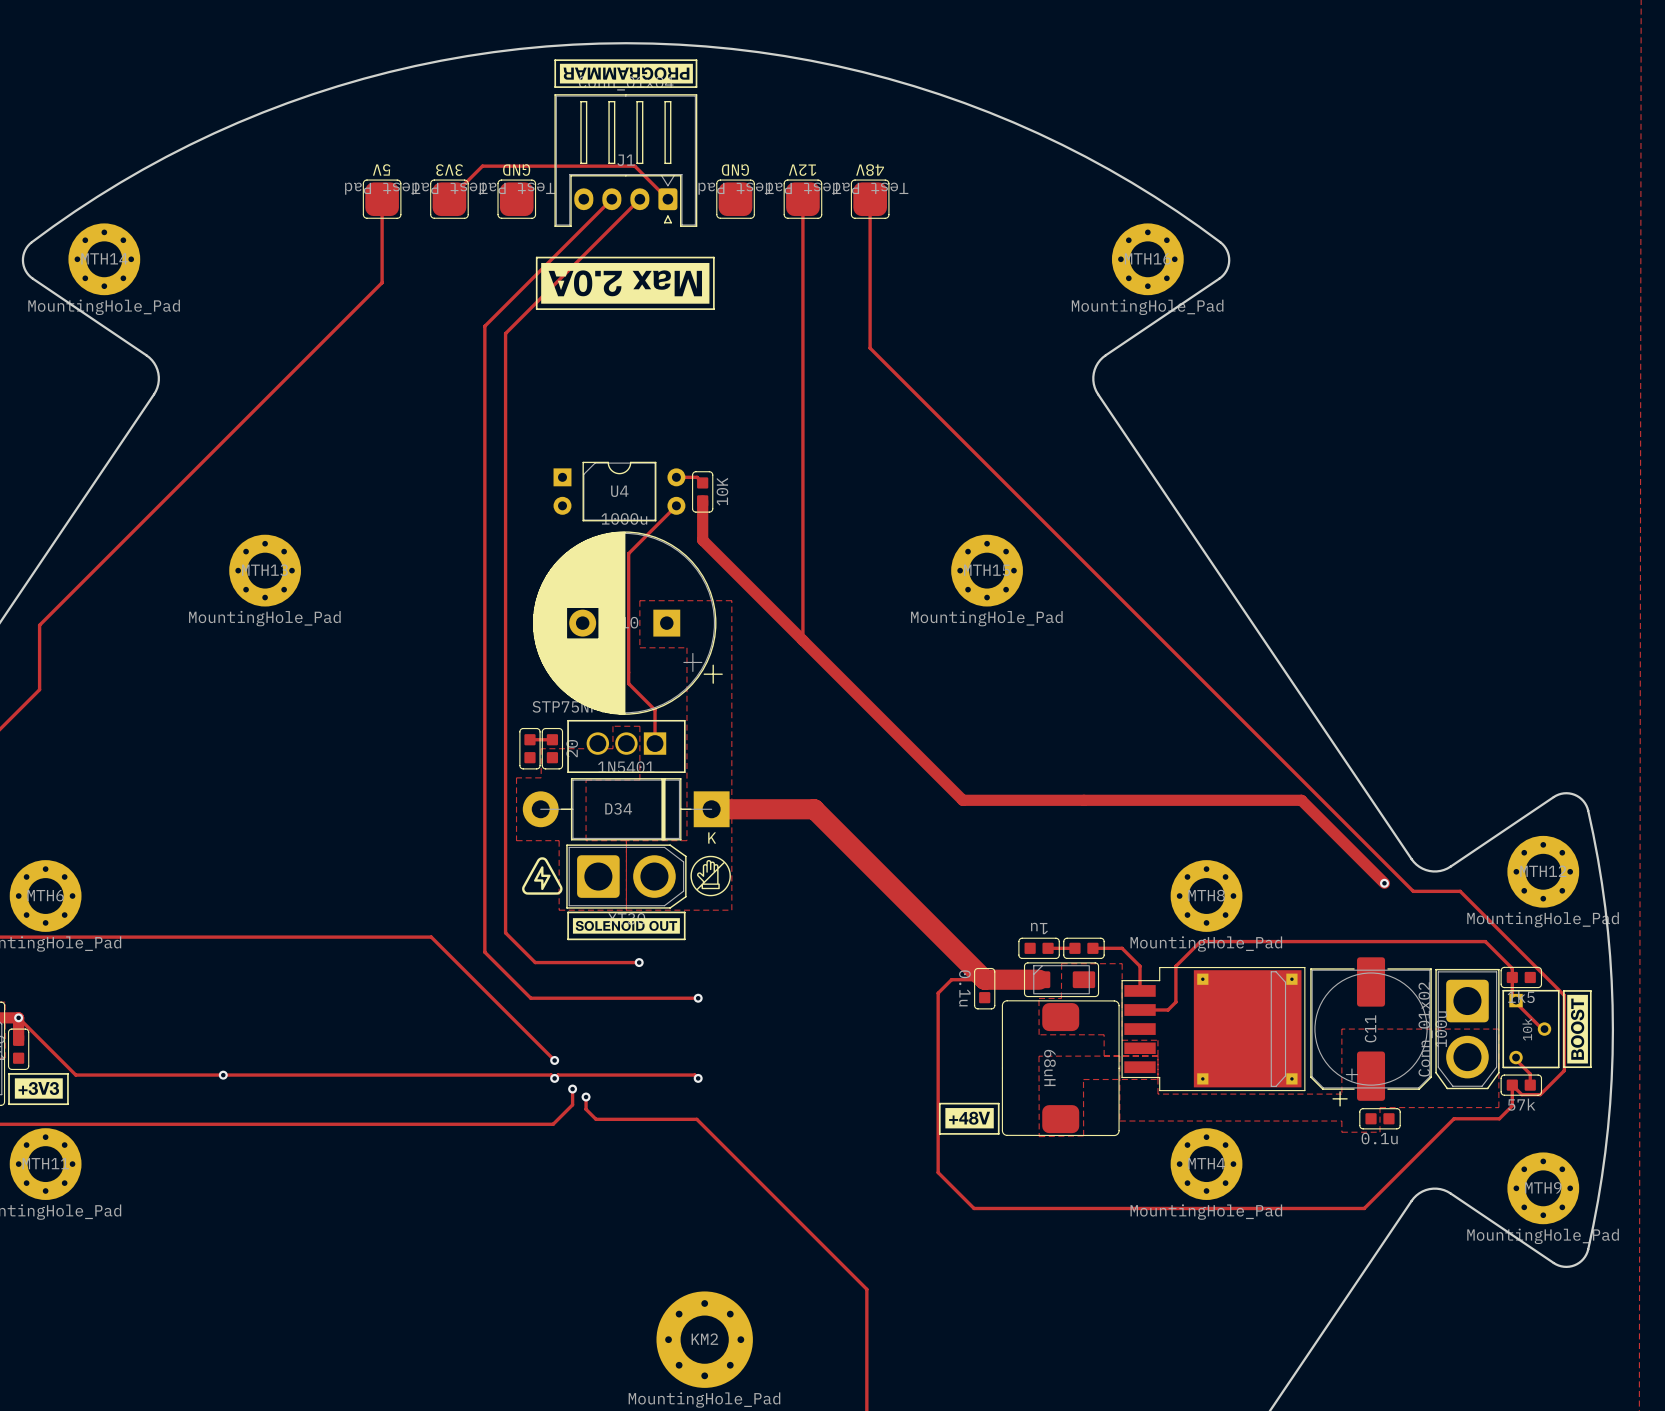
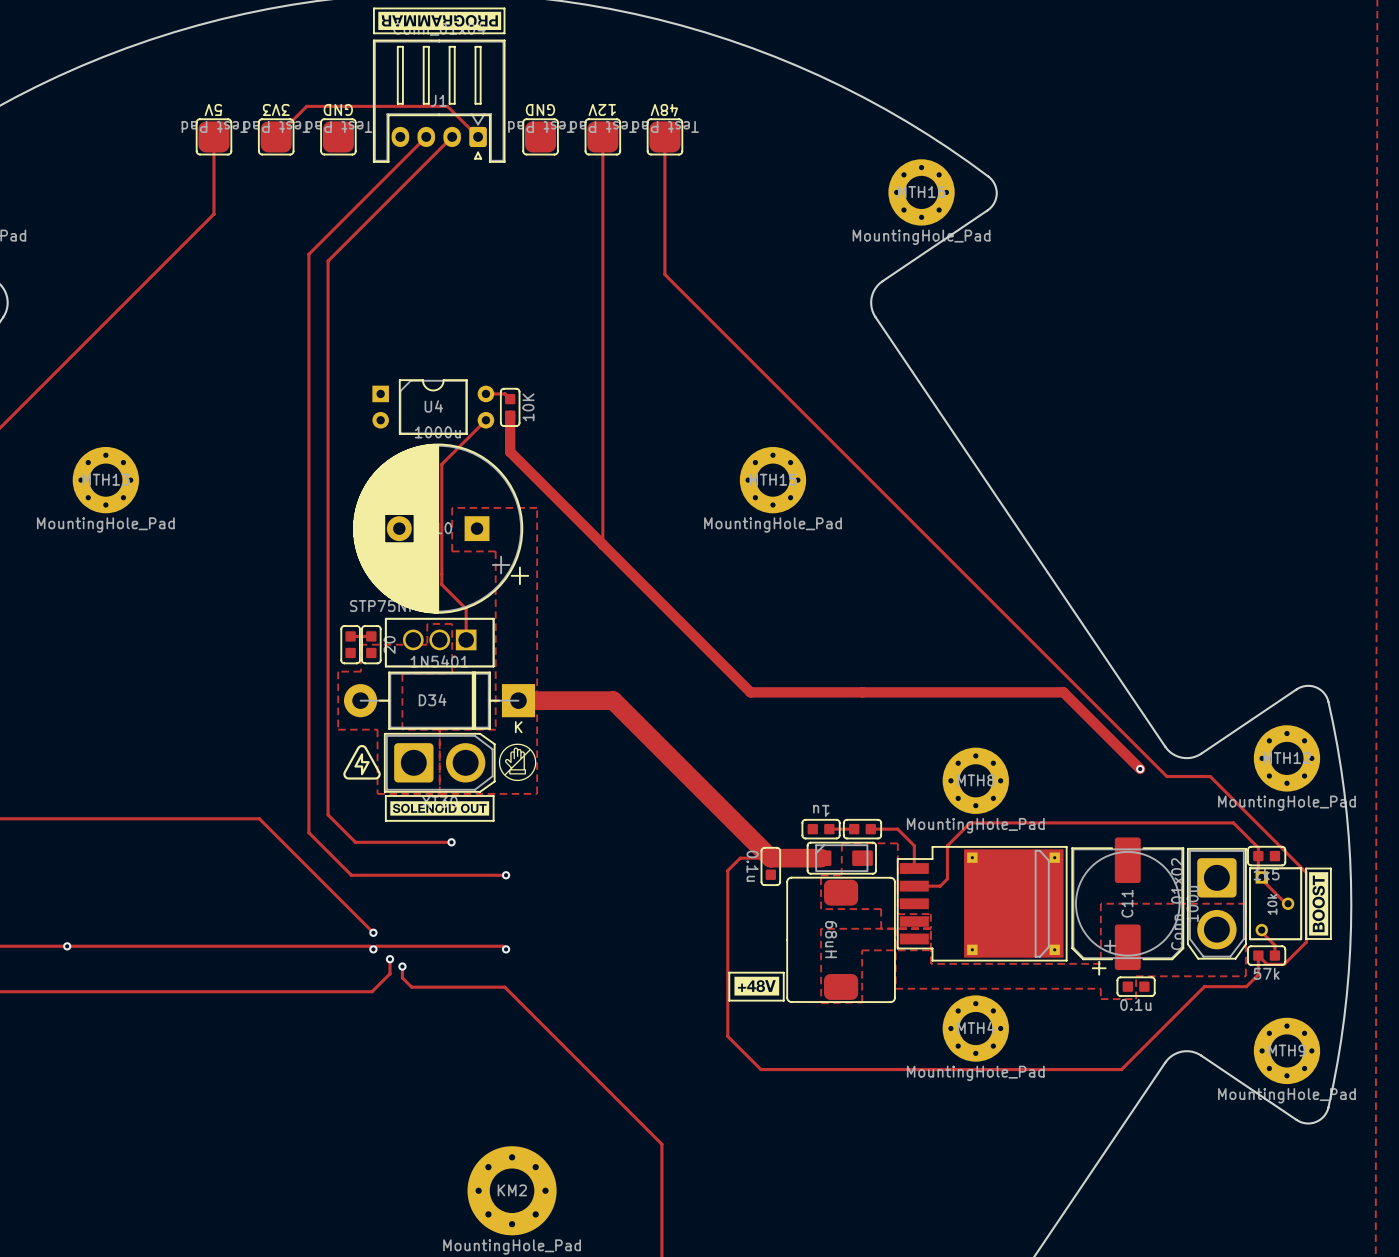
line: (536, 257) (713, 257) (713, 309) (536, 309) (536, 257) -> none
drawing: [541, 262, 710, 304] -> none

